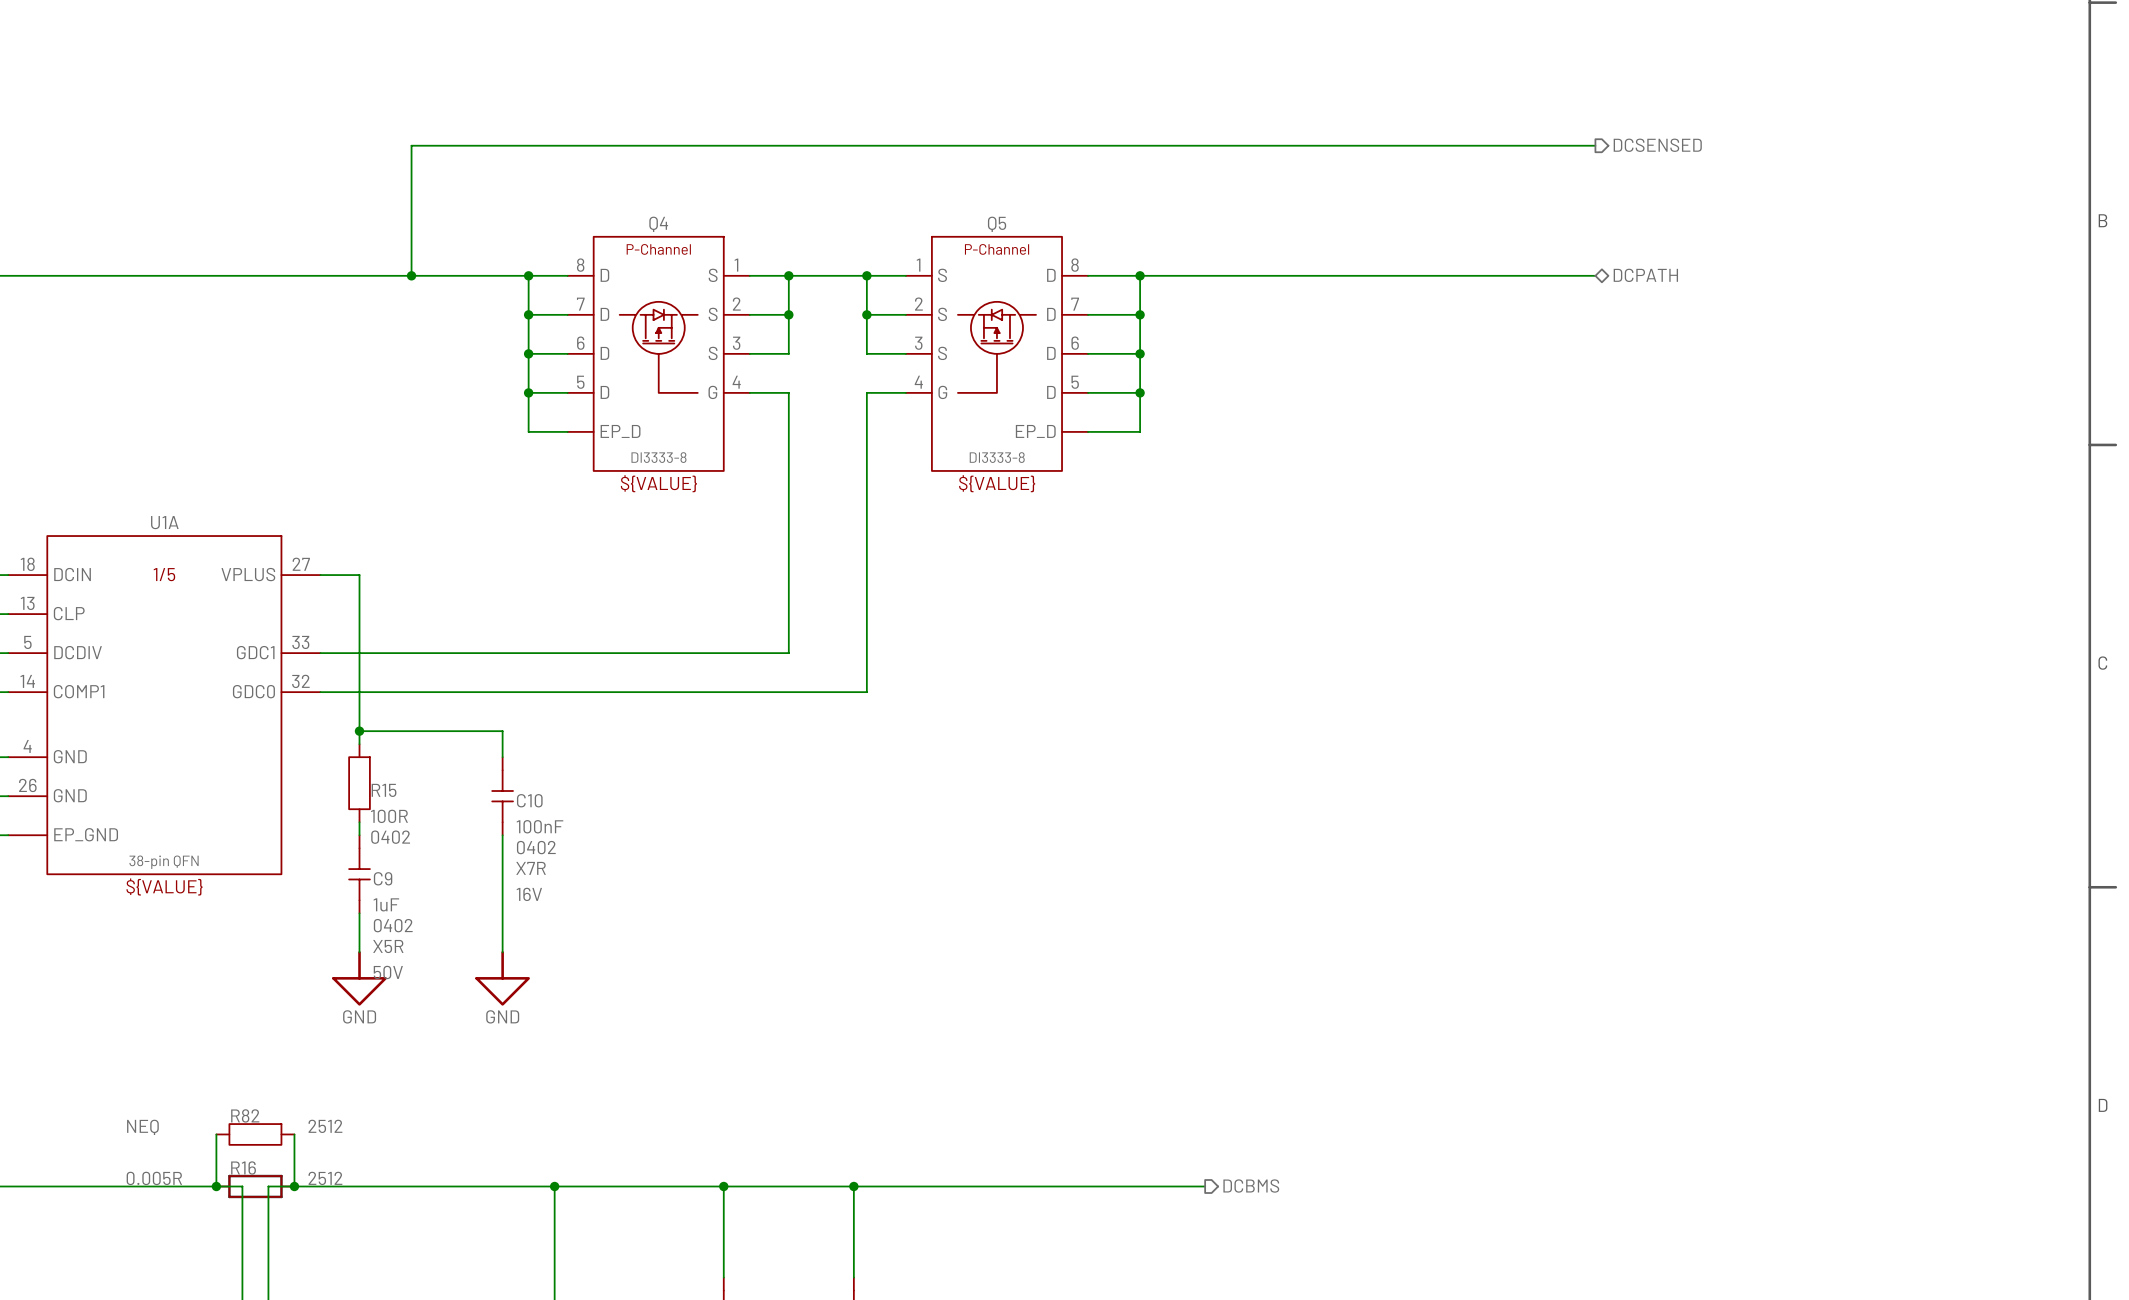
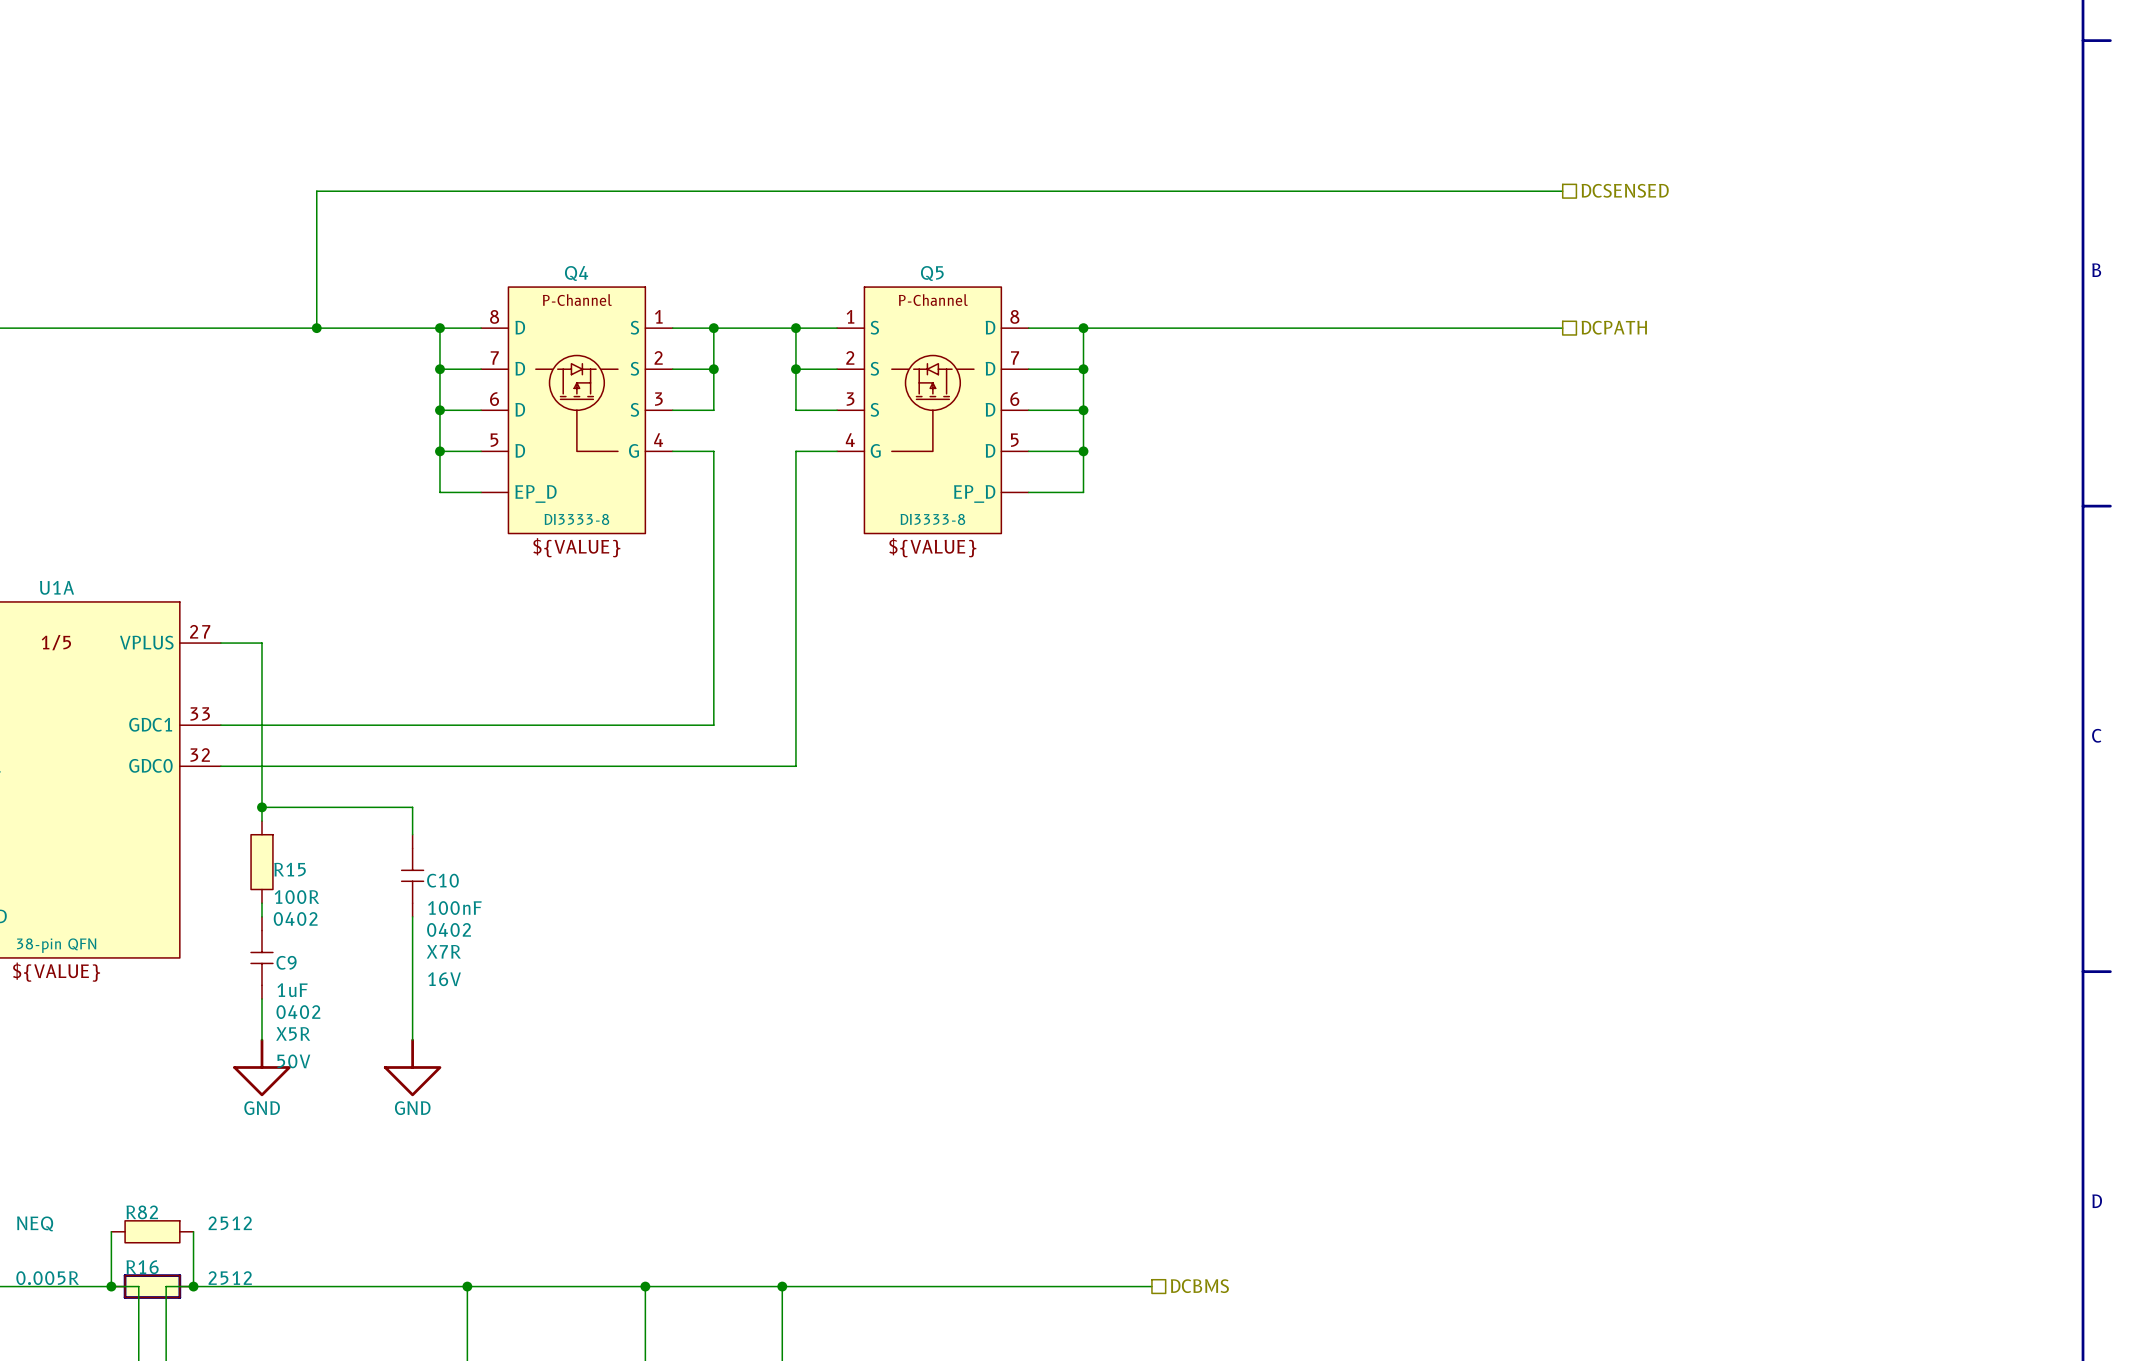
hierarchical label shape: output (1657, 145) -> passive (1625, 190)
hierarchical label shape: bidirectional (1645, 275) -> passive (1614, 327)
hierarchical label shape: output (1251, 1186) -> passive (1199, 1286)

